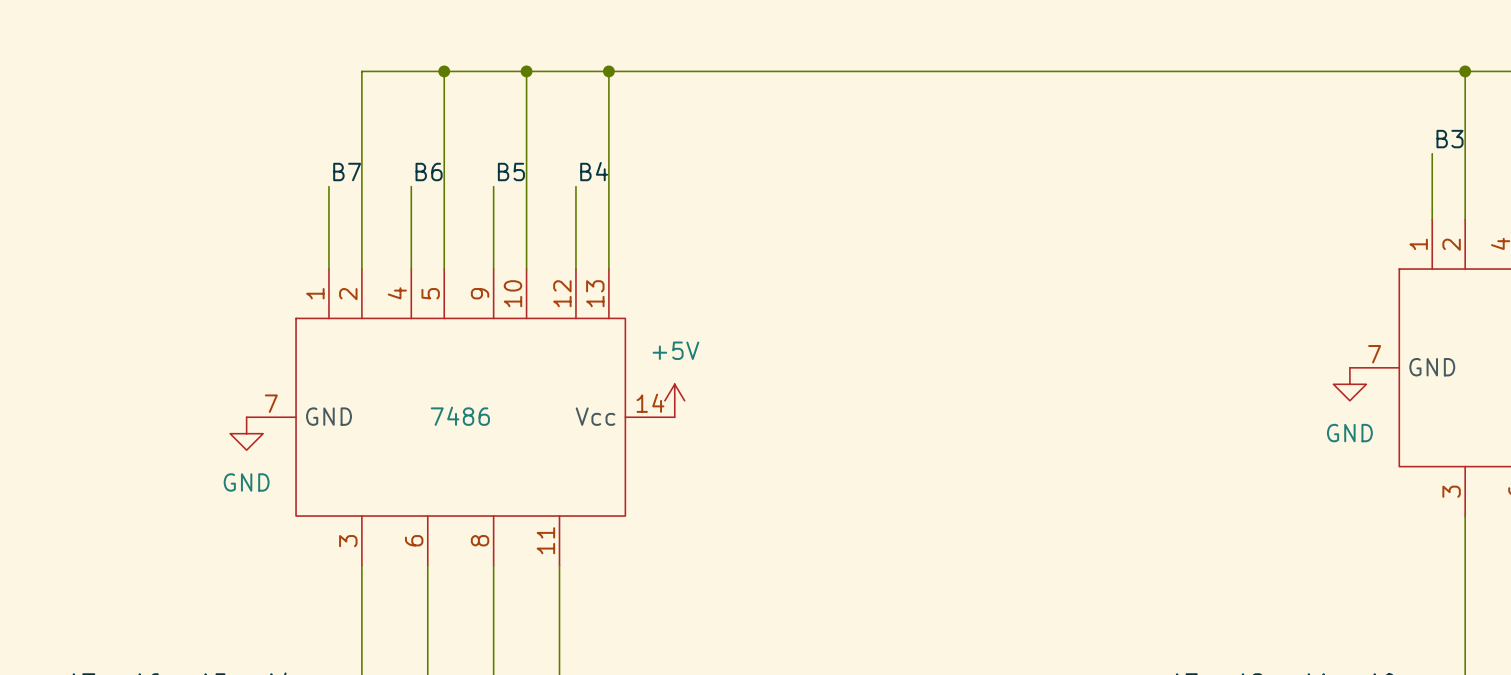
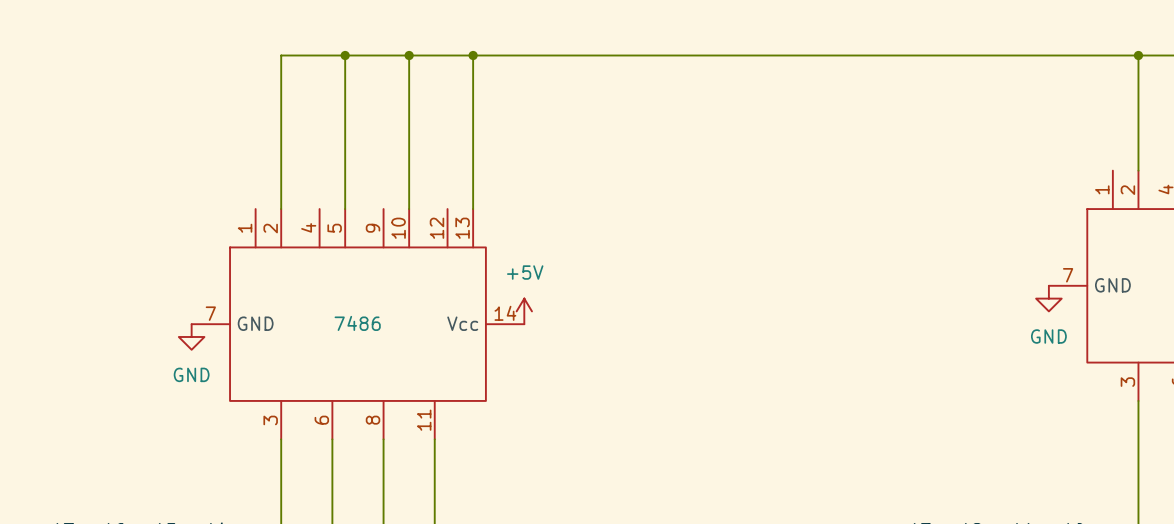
label: B3 (1450, 139) -> none
wire: (1432, 153) (1432, 219) -> none
label: B4 (594, 171) -> none
label: B7 (347, 172) -> none
label: B6 (429, 172) -> none
label: B5 (511, 172) -> none
wire: (328, 186) (328, 269) -> none
wire: (411, 186) (411, 269) -> none
wire: (493, 186) (493, 269) -> none
wire: (575, 186) (575, 269) -> none

